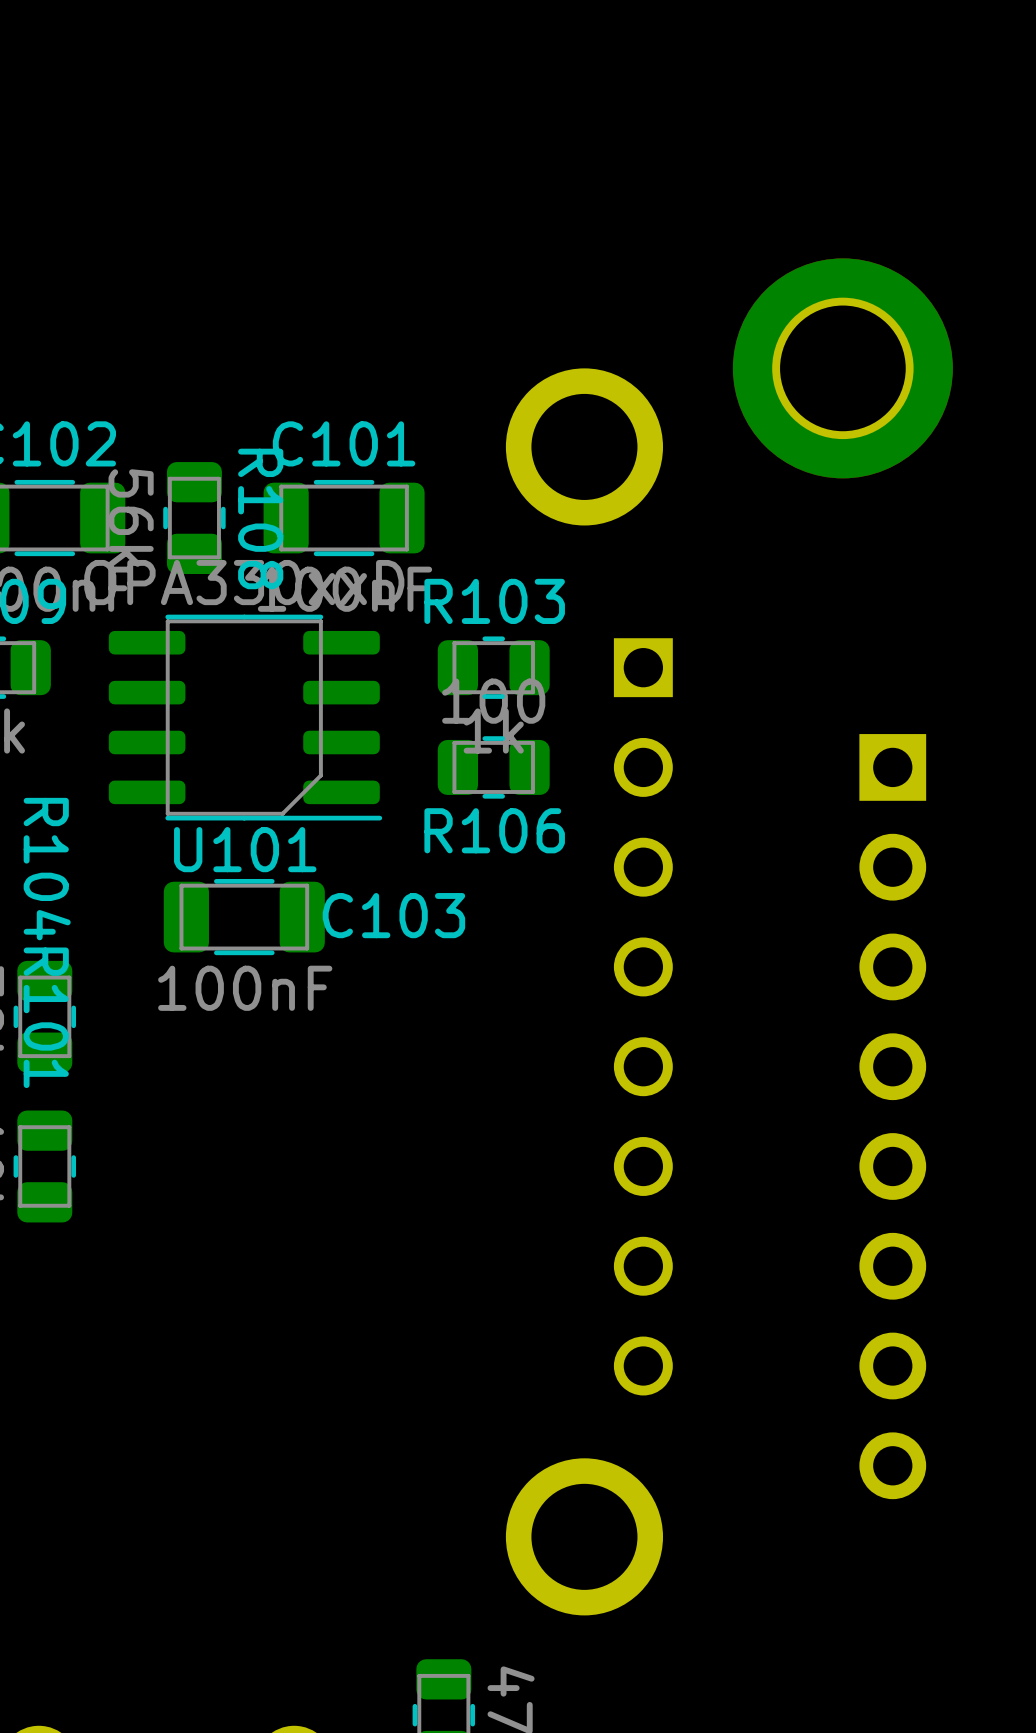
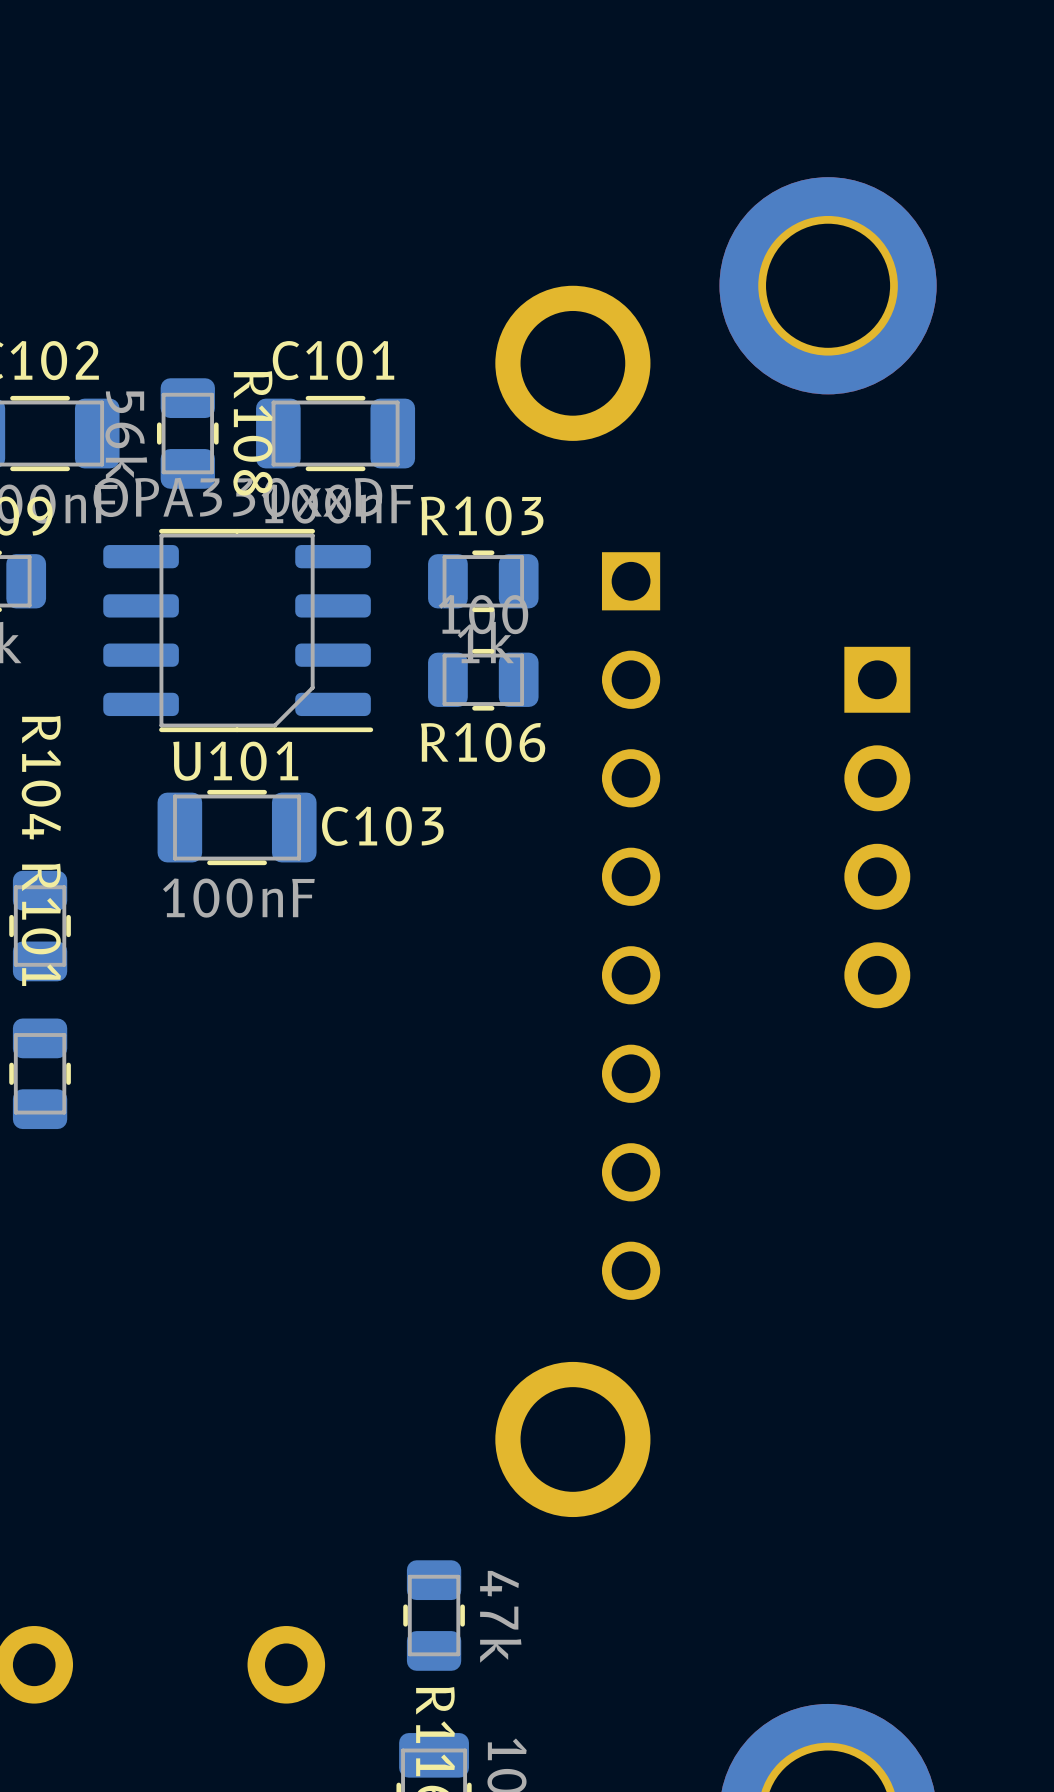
part: (892, 1116) -> none

